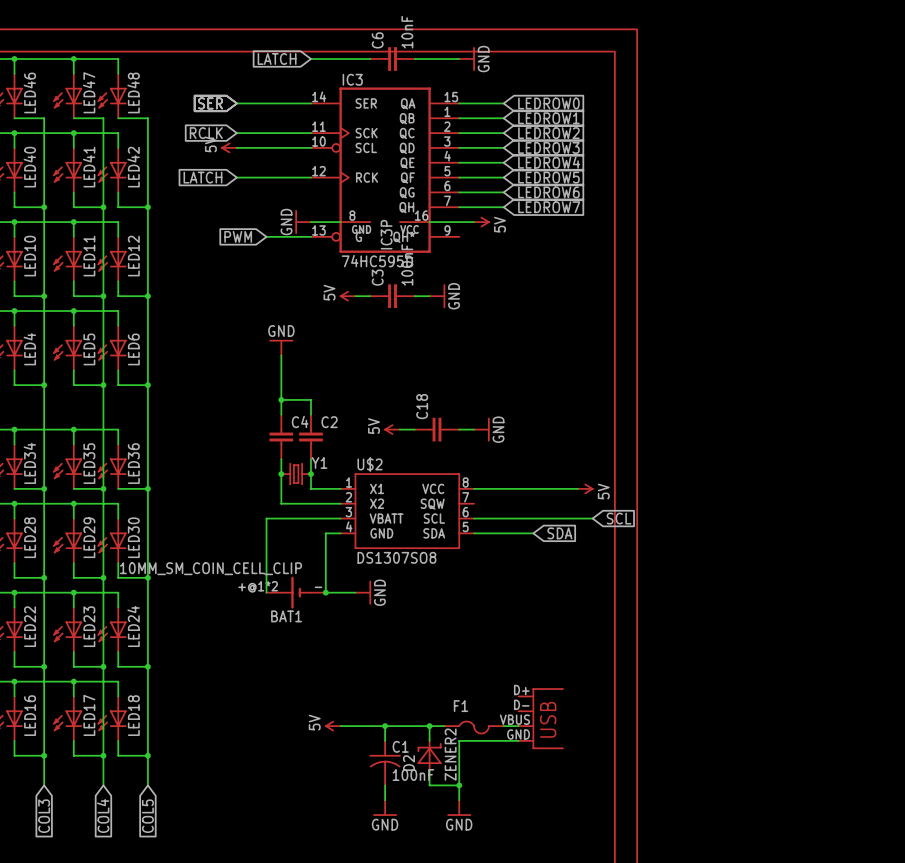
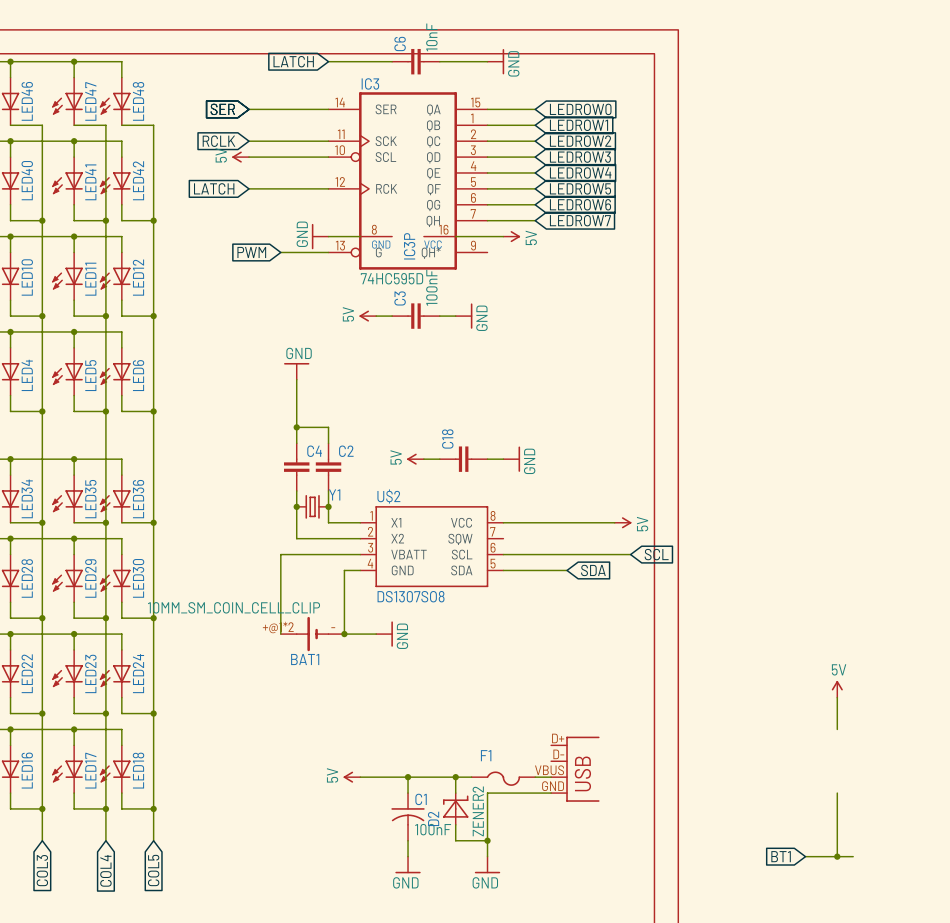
power symbol: none -> 5V (837, 689)
wire: none -> (837, 697) (837, 729)
wire: none -> (837, 793) (837, 856)
global label: none -> BT1 (781, 856)
wire: none -> (805, 856) (853, 856)
junction: none -> (837, 856)

